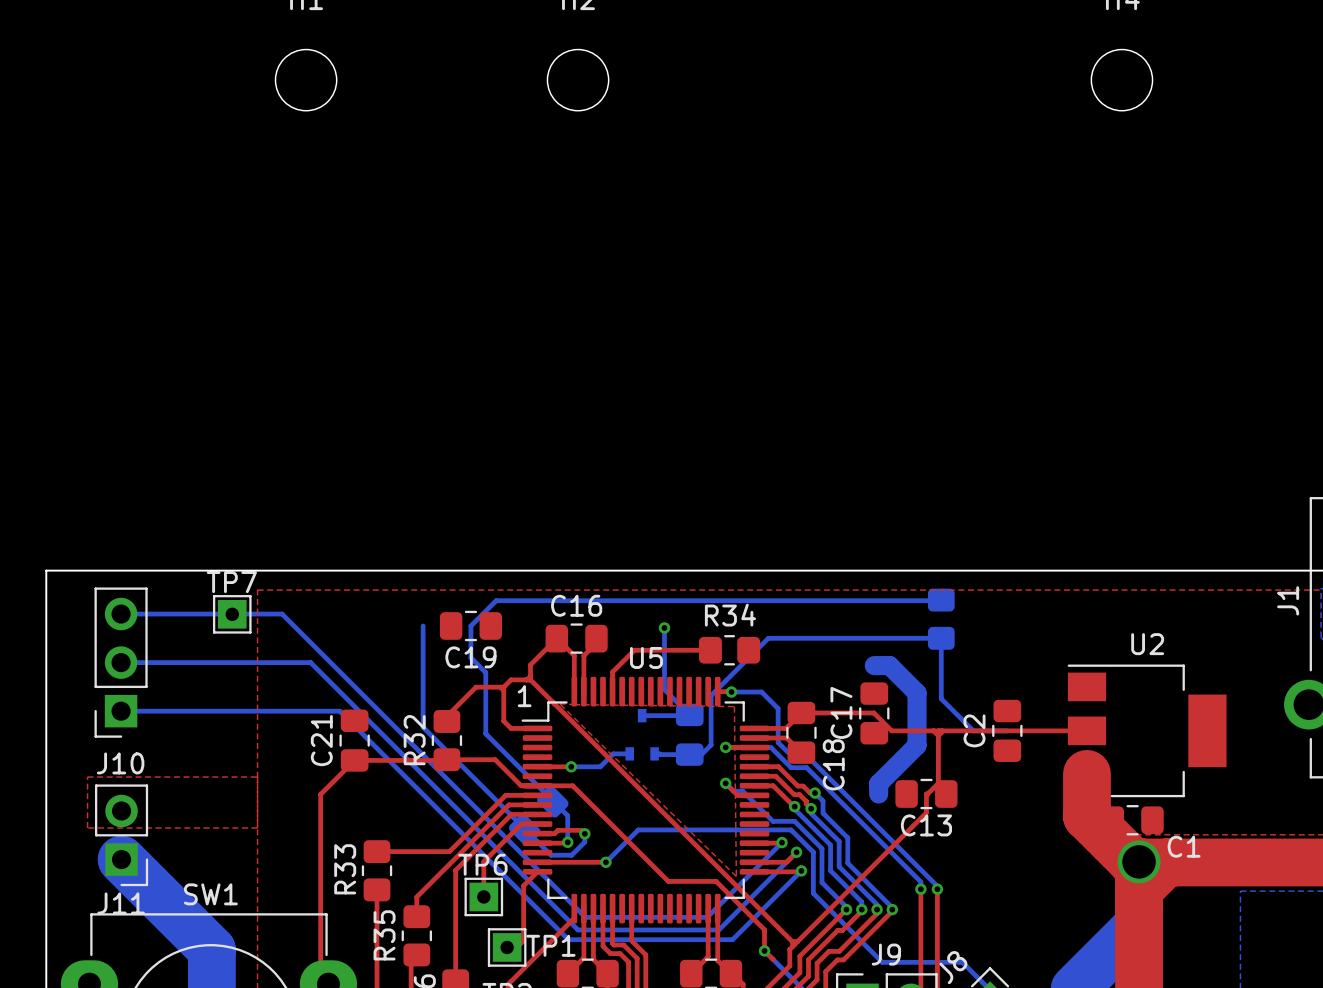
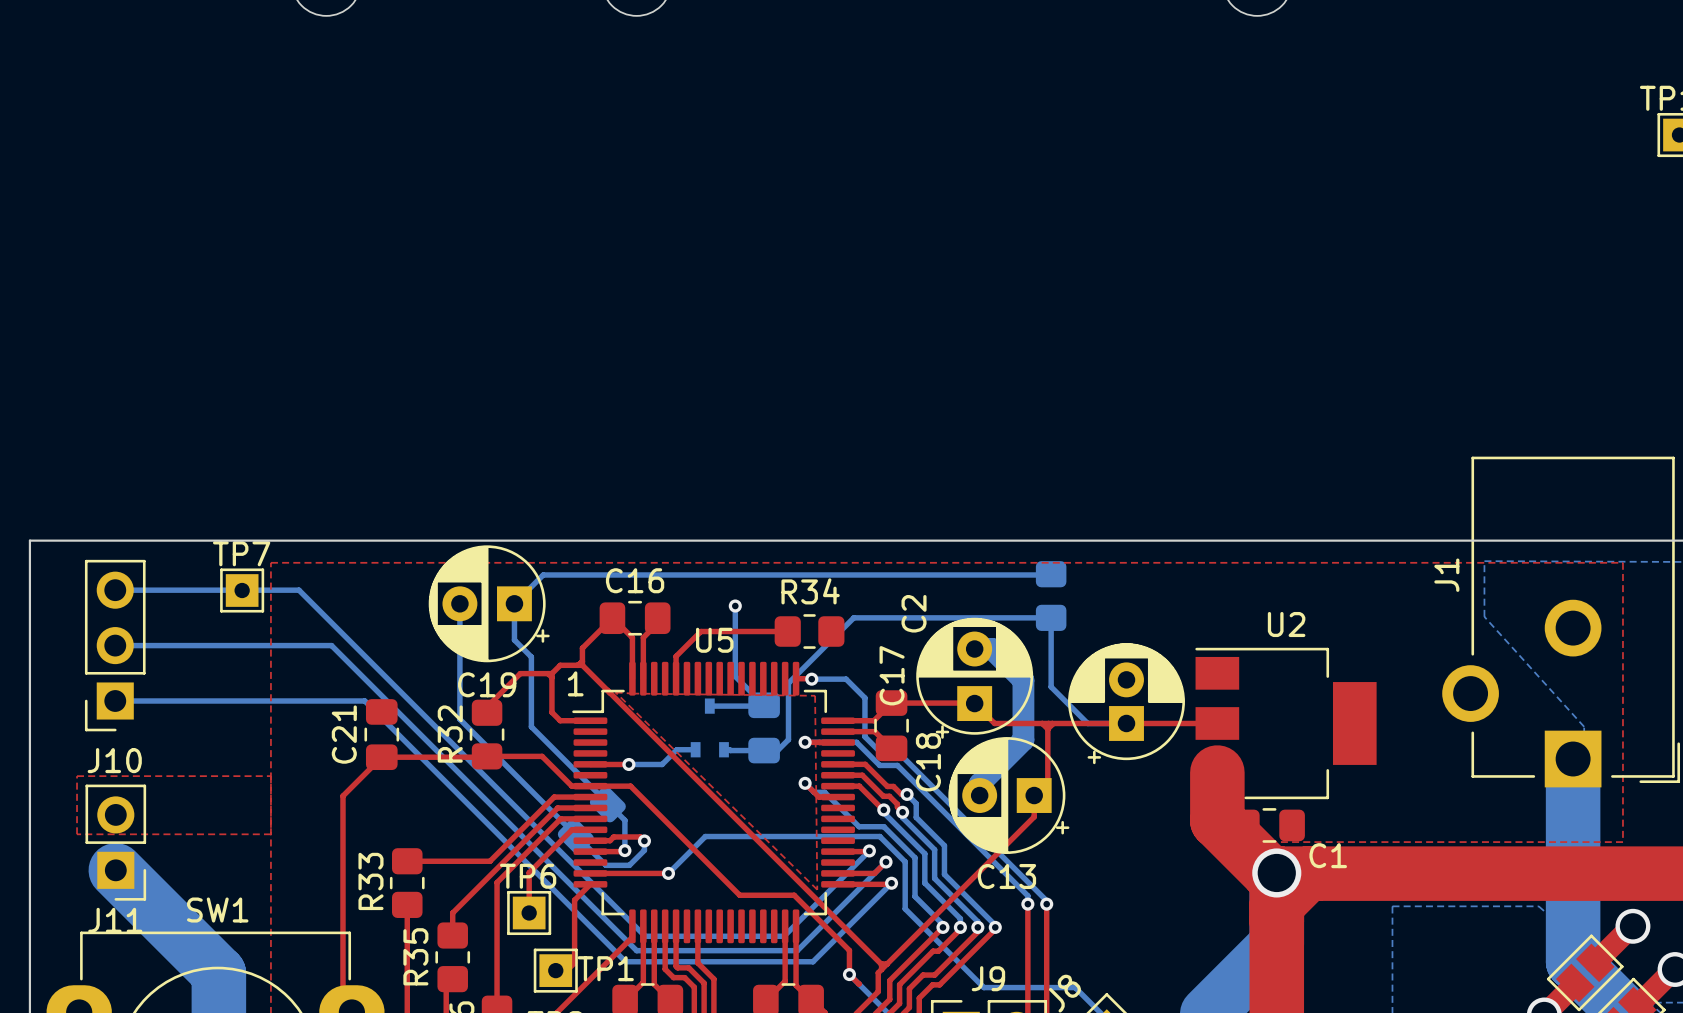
C19 footprint: [439, 610, 503, 642] -> [428, 545, 550, 663]
C19 name position: C19 (470, 657) -> C19 (487, 684)
C17 footprint: [859, 682, 890, 745] -> [916, 617, 1034, 739]
C2 footprint: [992, 699, 1023, 762] -> [1068, 643, 1185, 765]
C17 name position: C17 (841, 712) -> C17 (892, 675)
C2 name position: C2 (974, 730) -> C2 (914, 613)
C13 footprint: [895, 778, 958, 810] -> [948, 737, 1070, 854]
C13 name position: C13 (926, 825) -> C13 (1006, 876)

